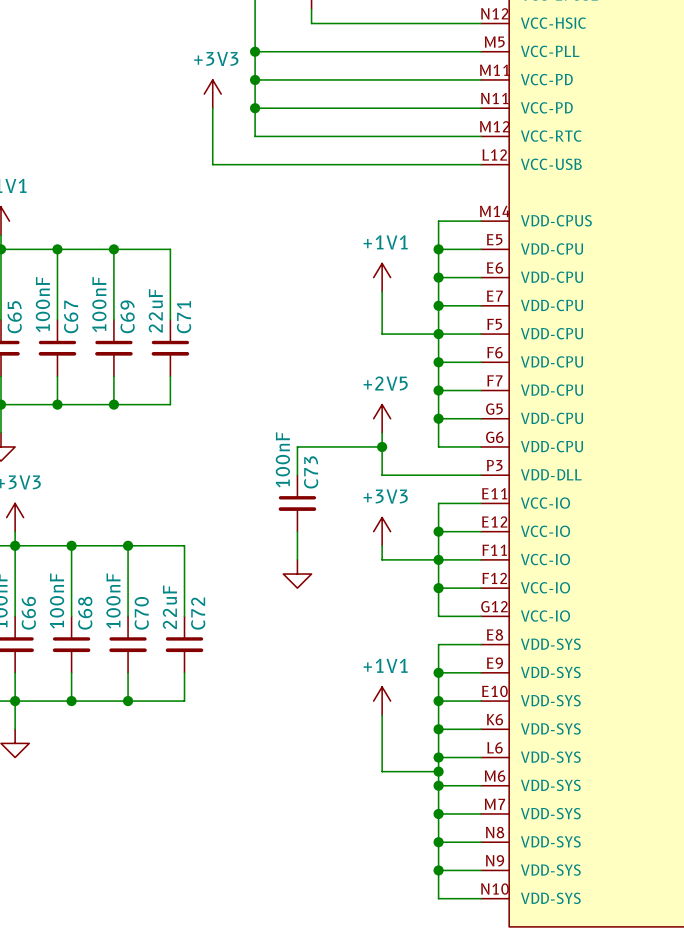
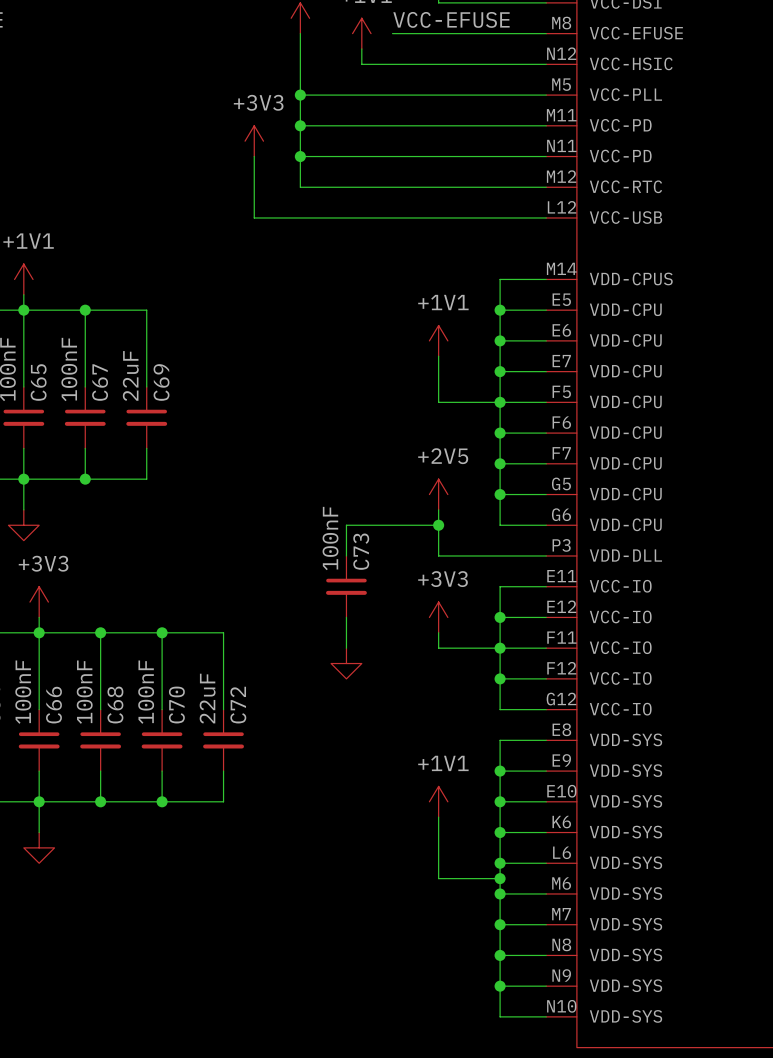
wire: (113, 249) (170, 249) (170, 319) -> none
junction: (113, 249) -> none
C69 value: 100nF (99, 304) -> 22uF (130, 375)
C71: 22uF (170, 348) -> none
wire: (170, 376) (170, 404) (113, 404) -> none
junction: (113, 404) -> none

